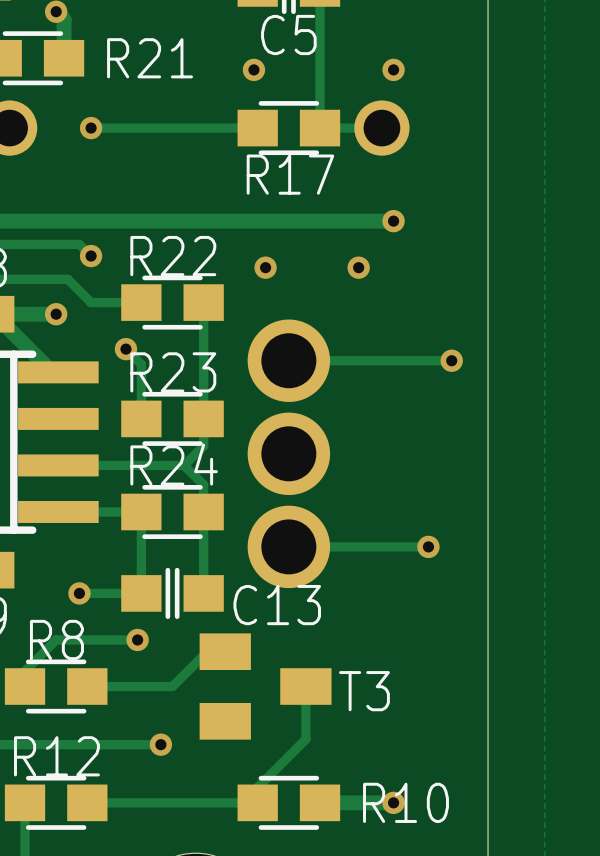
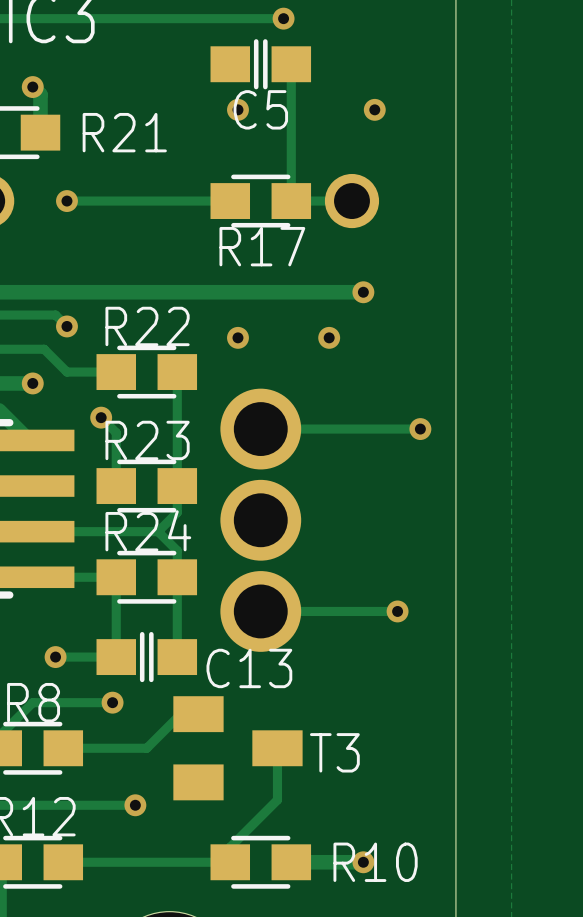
via position: (253, 69) -> (237, 109)
via position: (393, 69) -> (374, 109)

